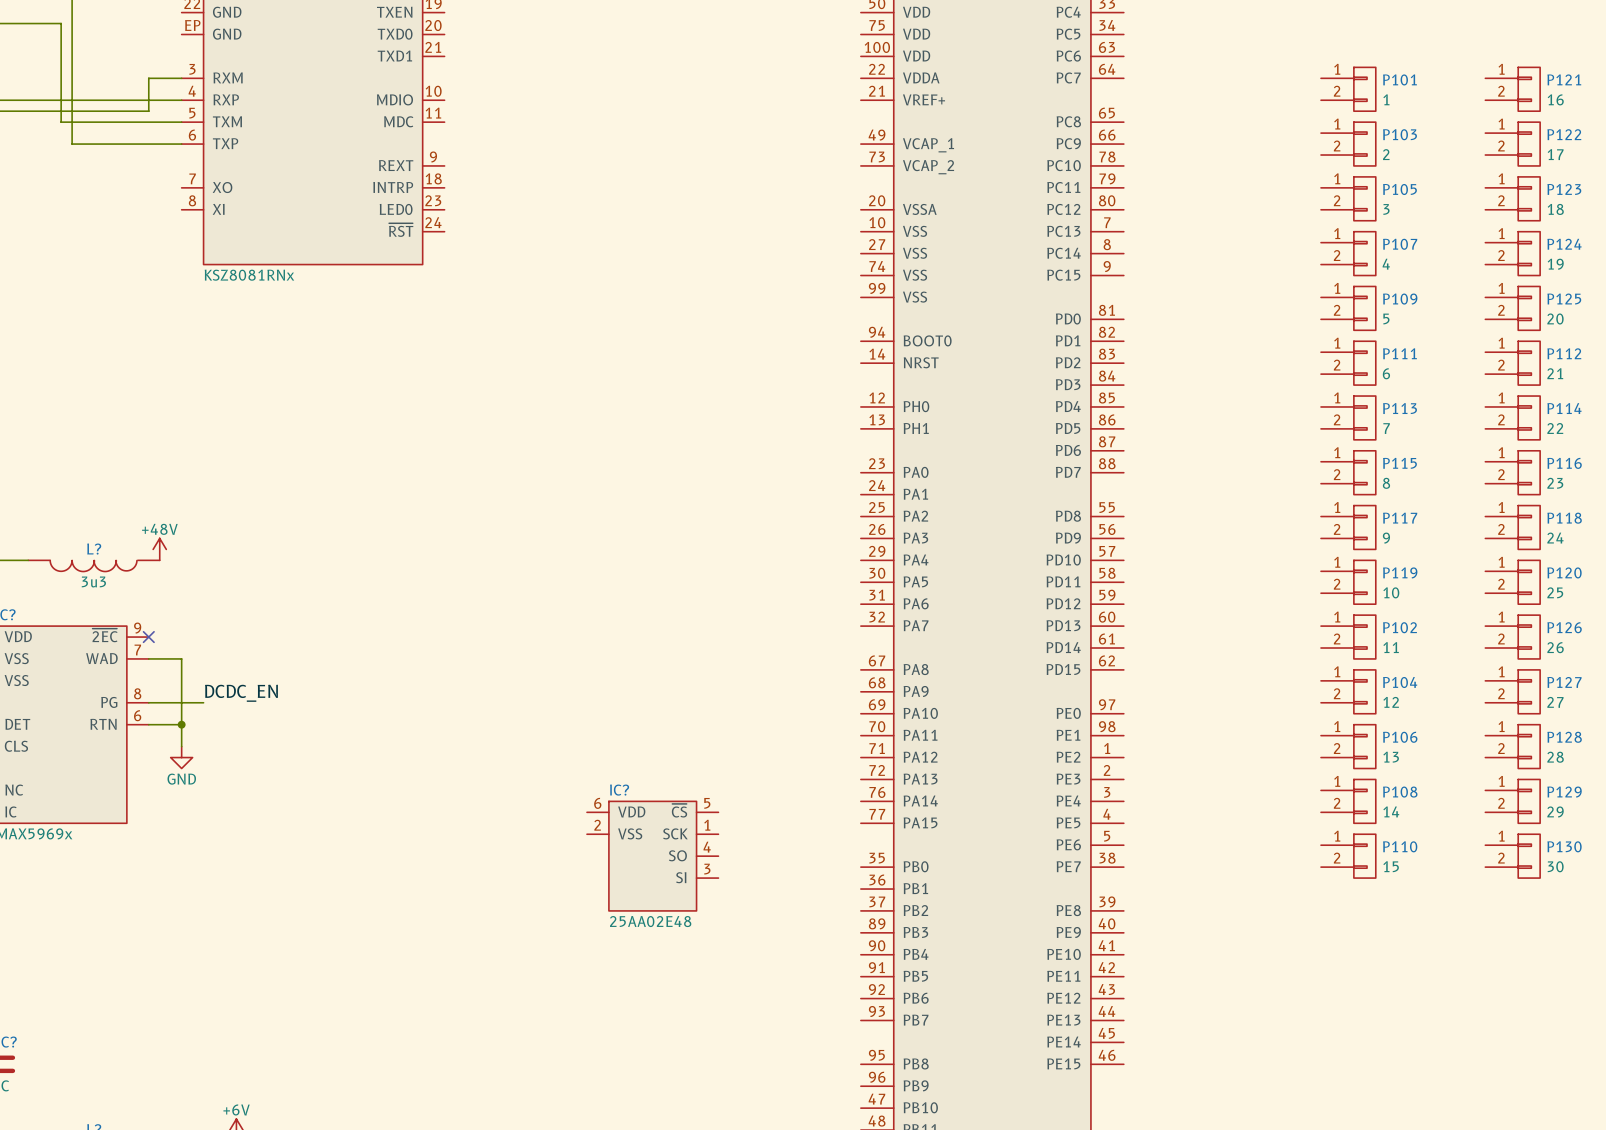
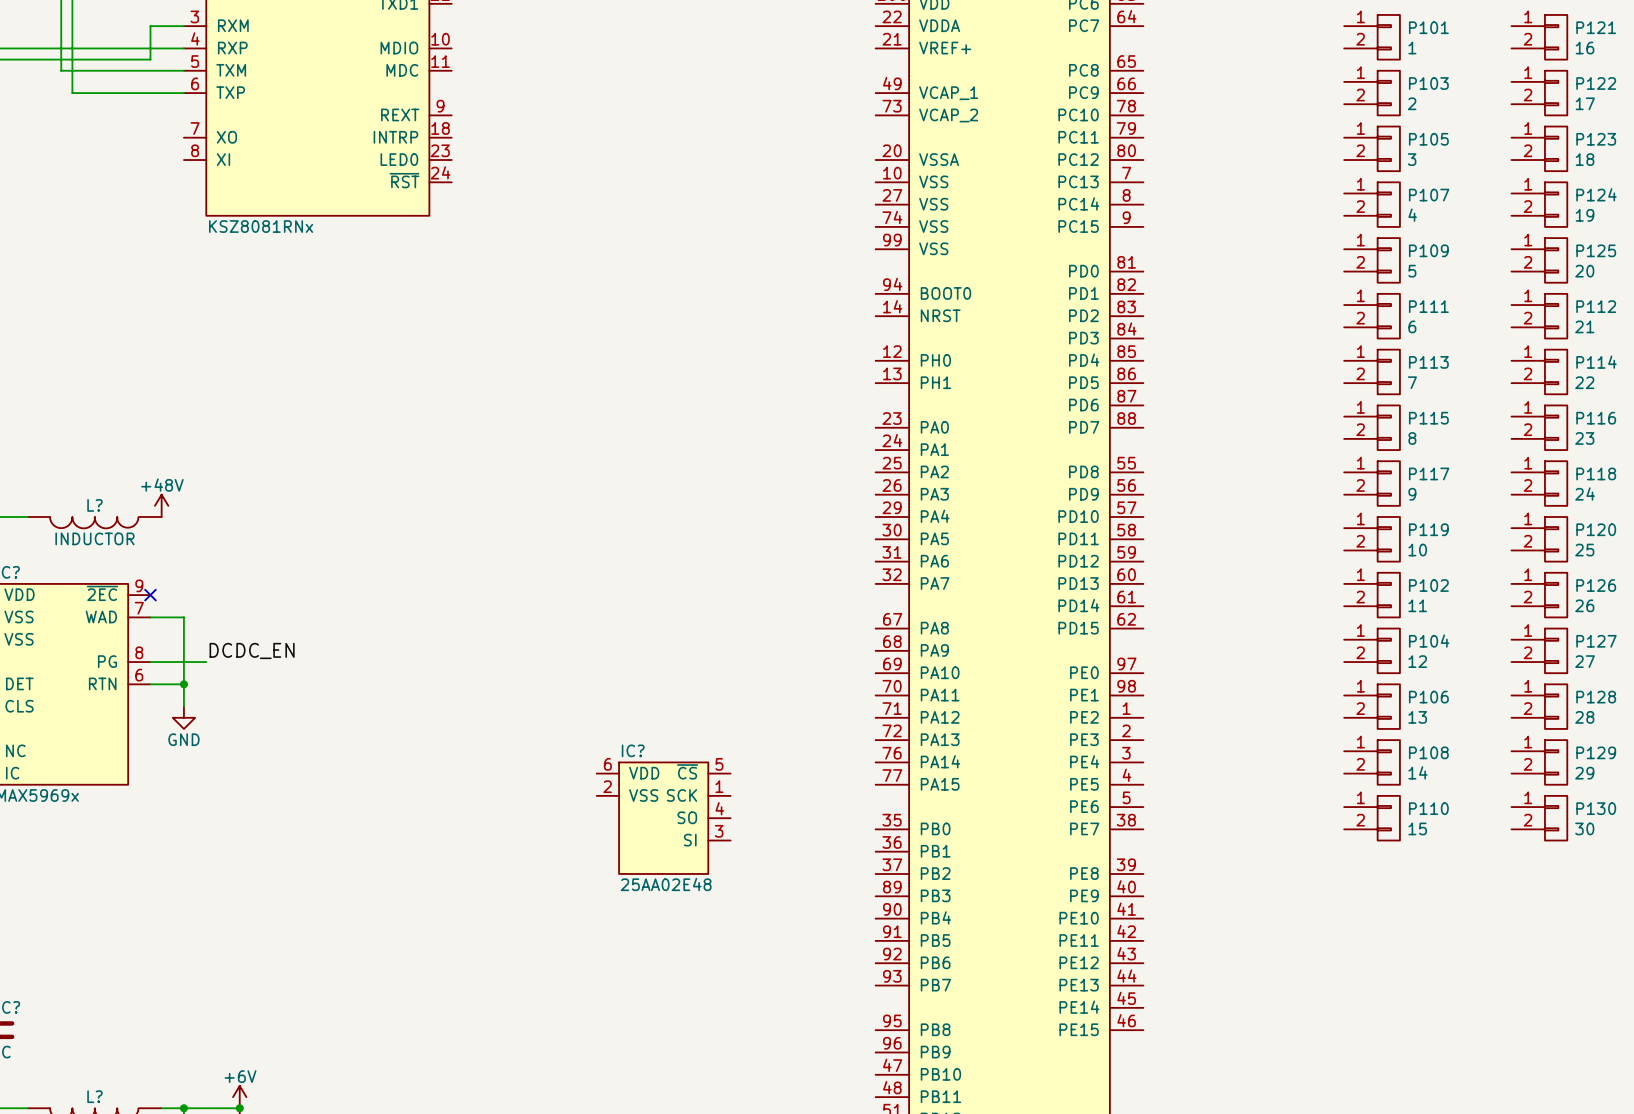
L? value: 3u3 (93, 581) -> INDUCTOR (94, 538)

